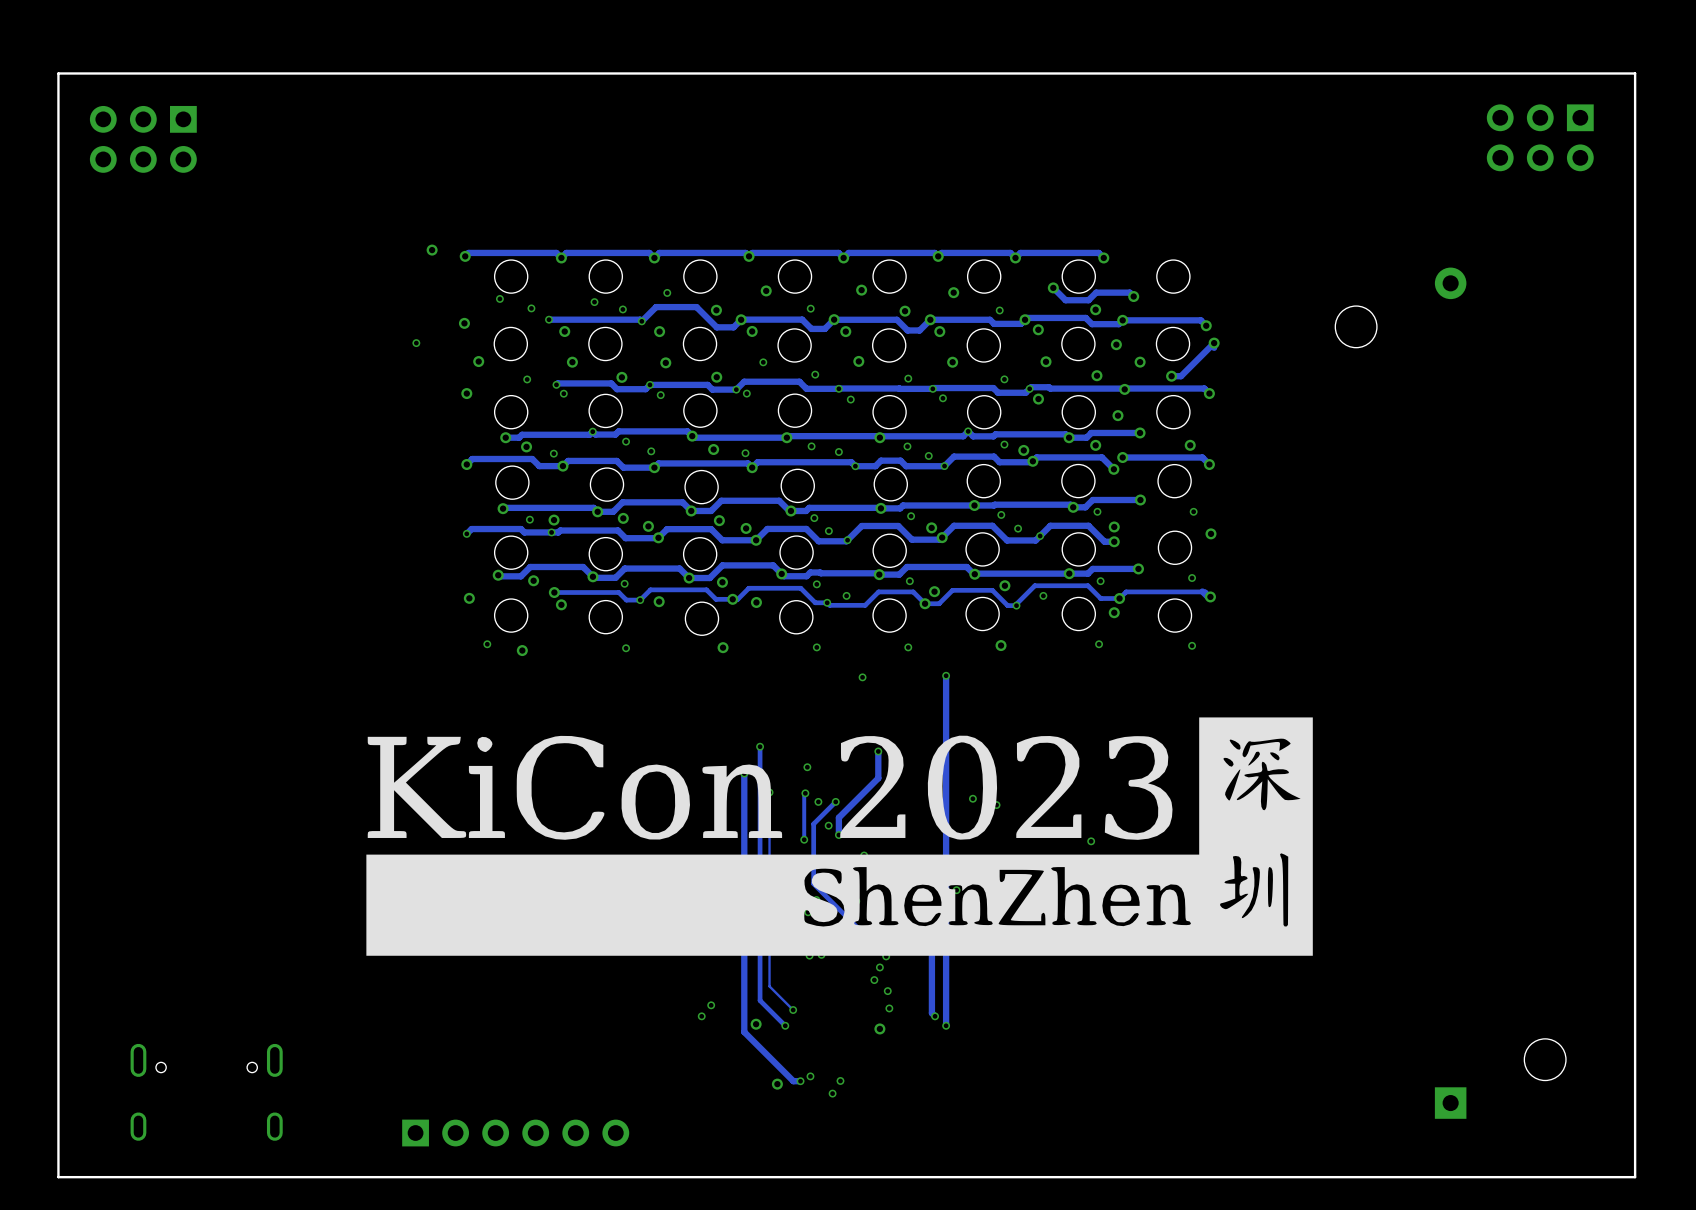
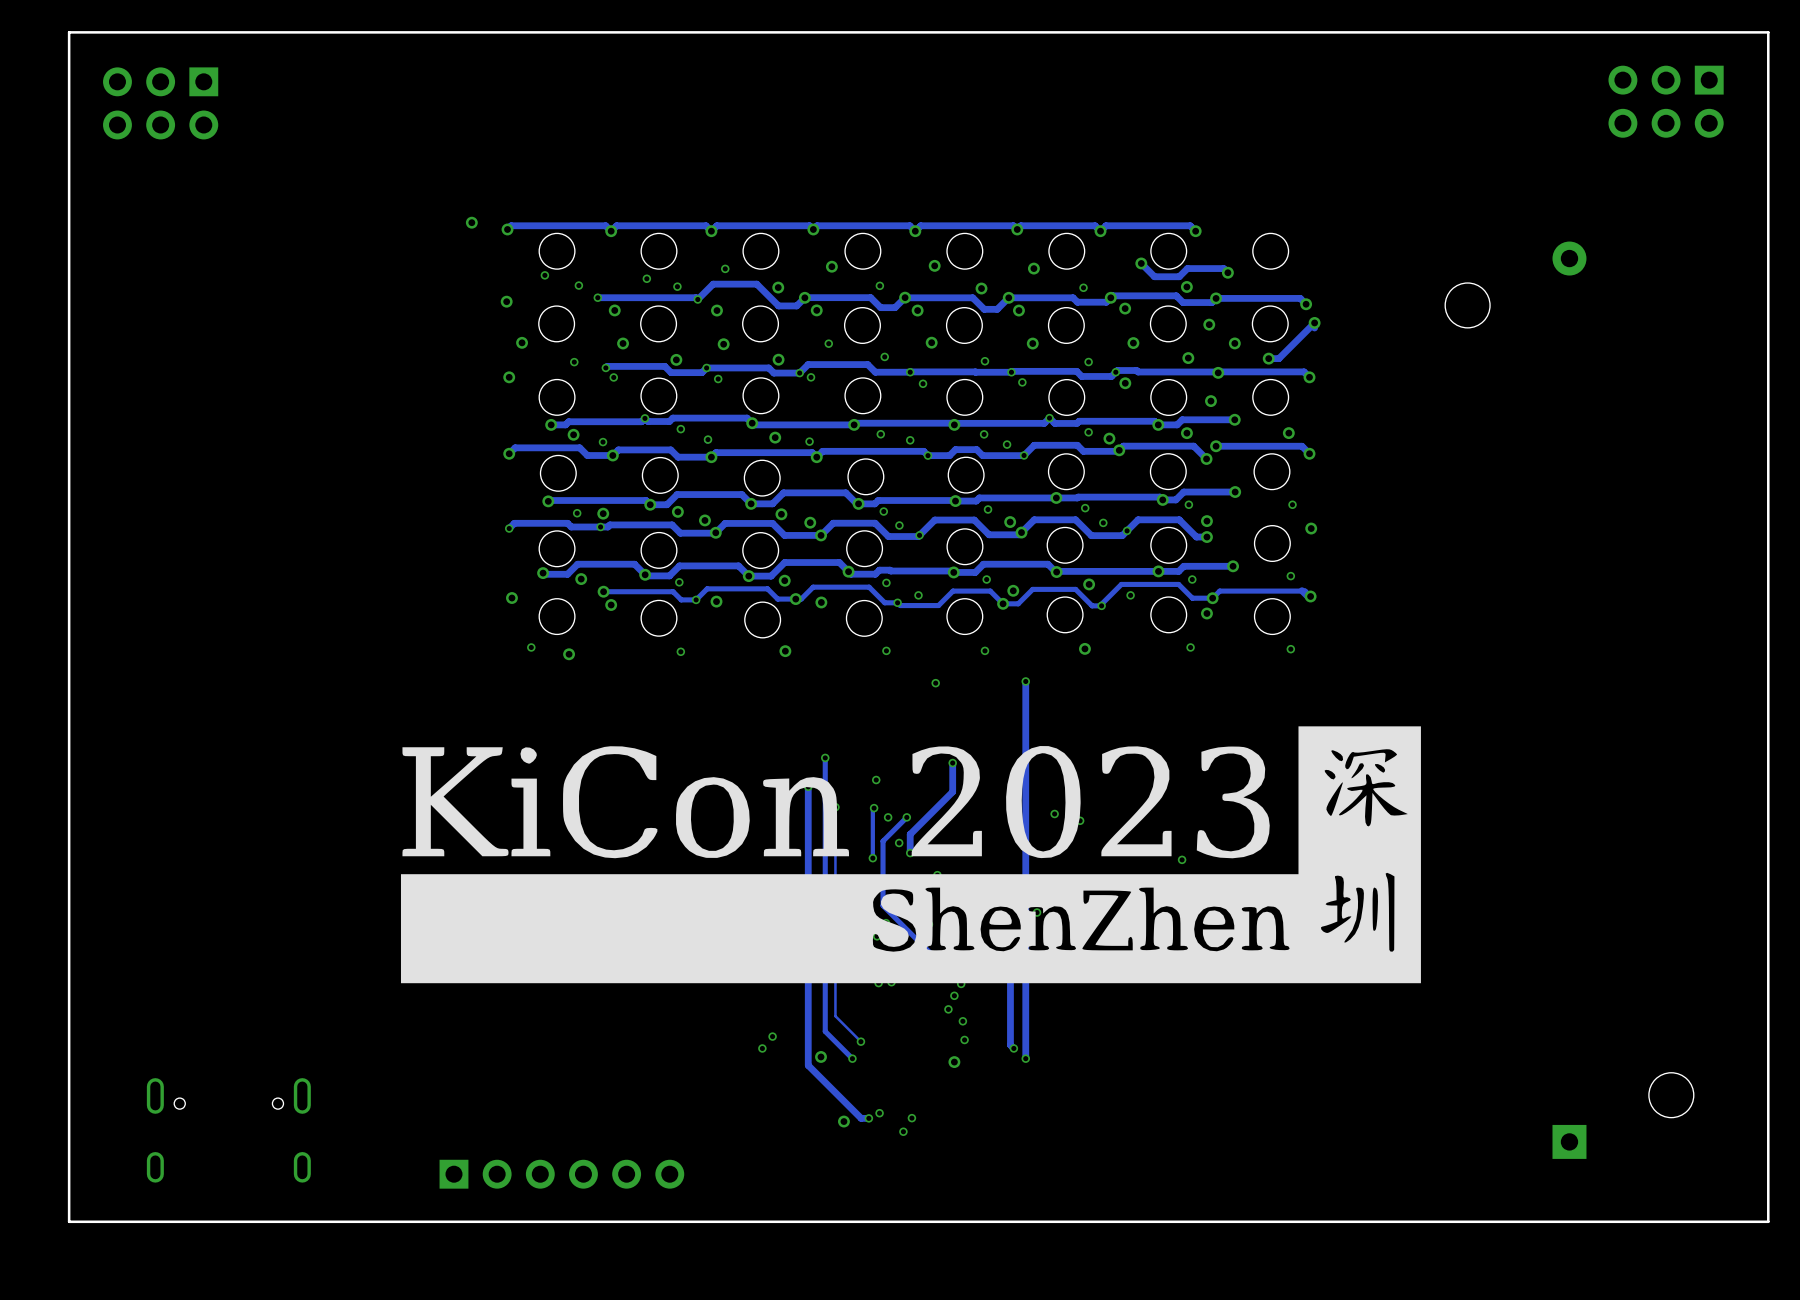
via: (416, 343) -> none

